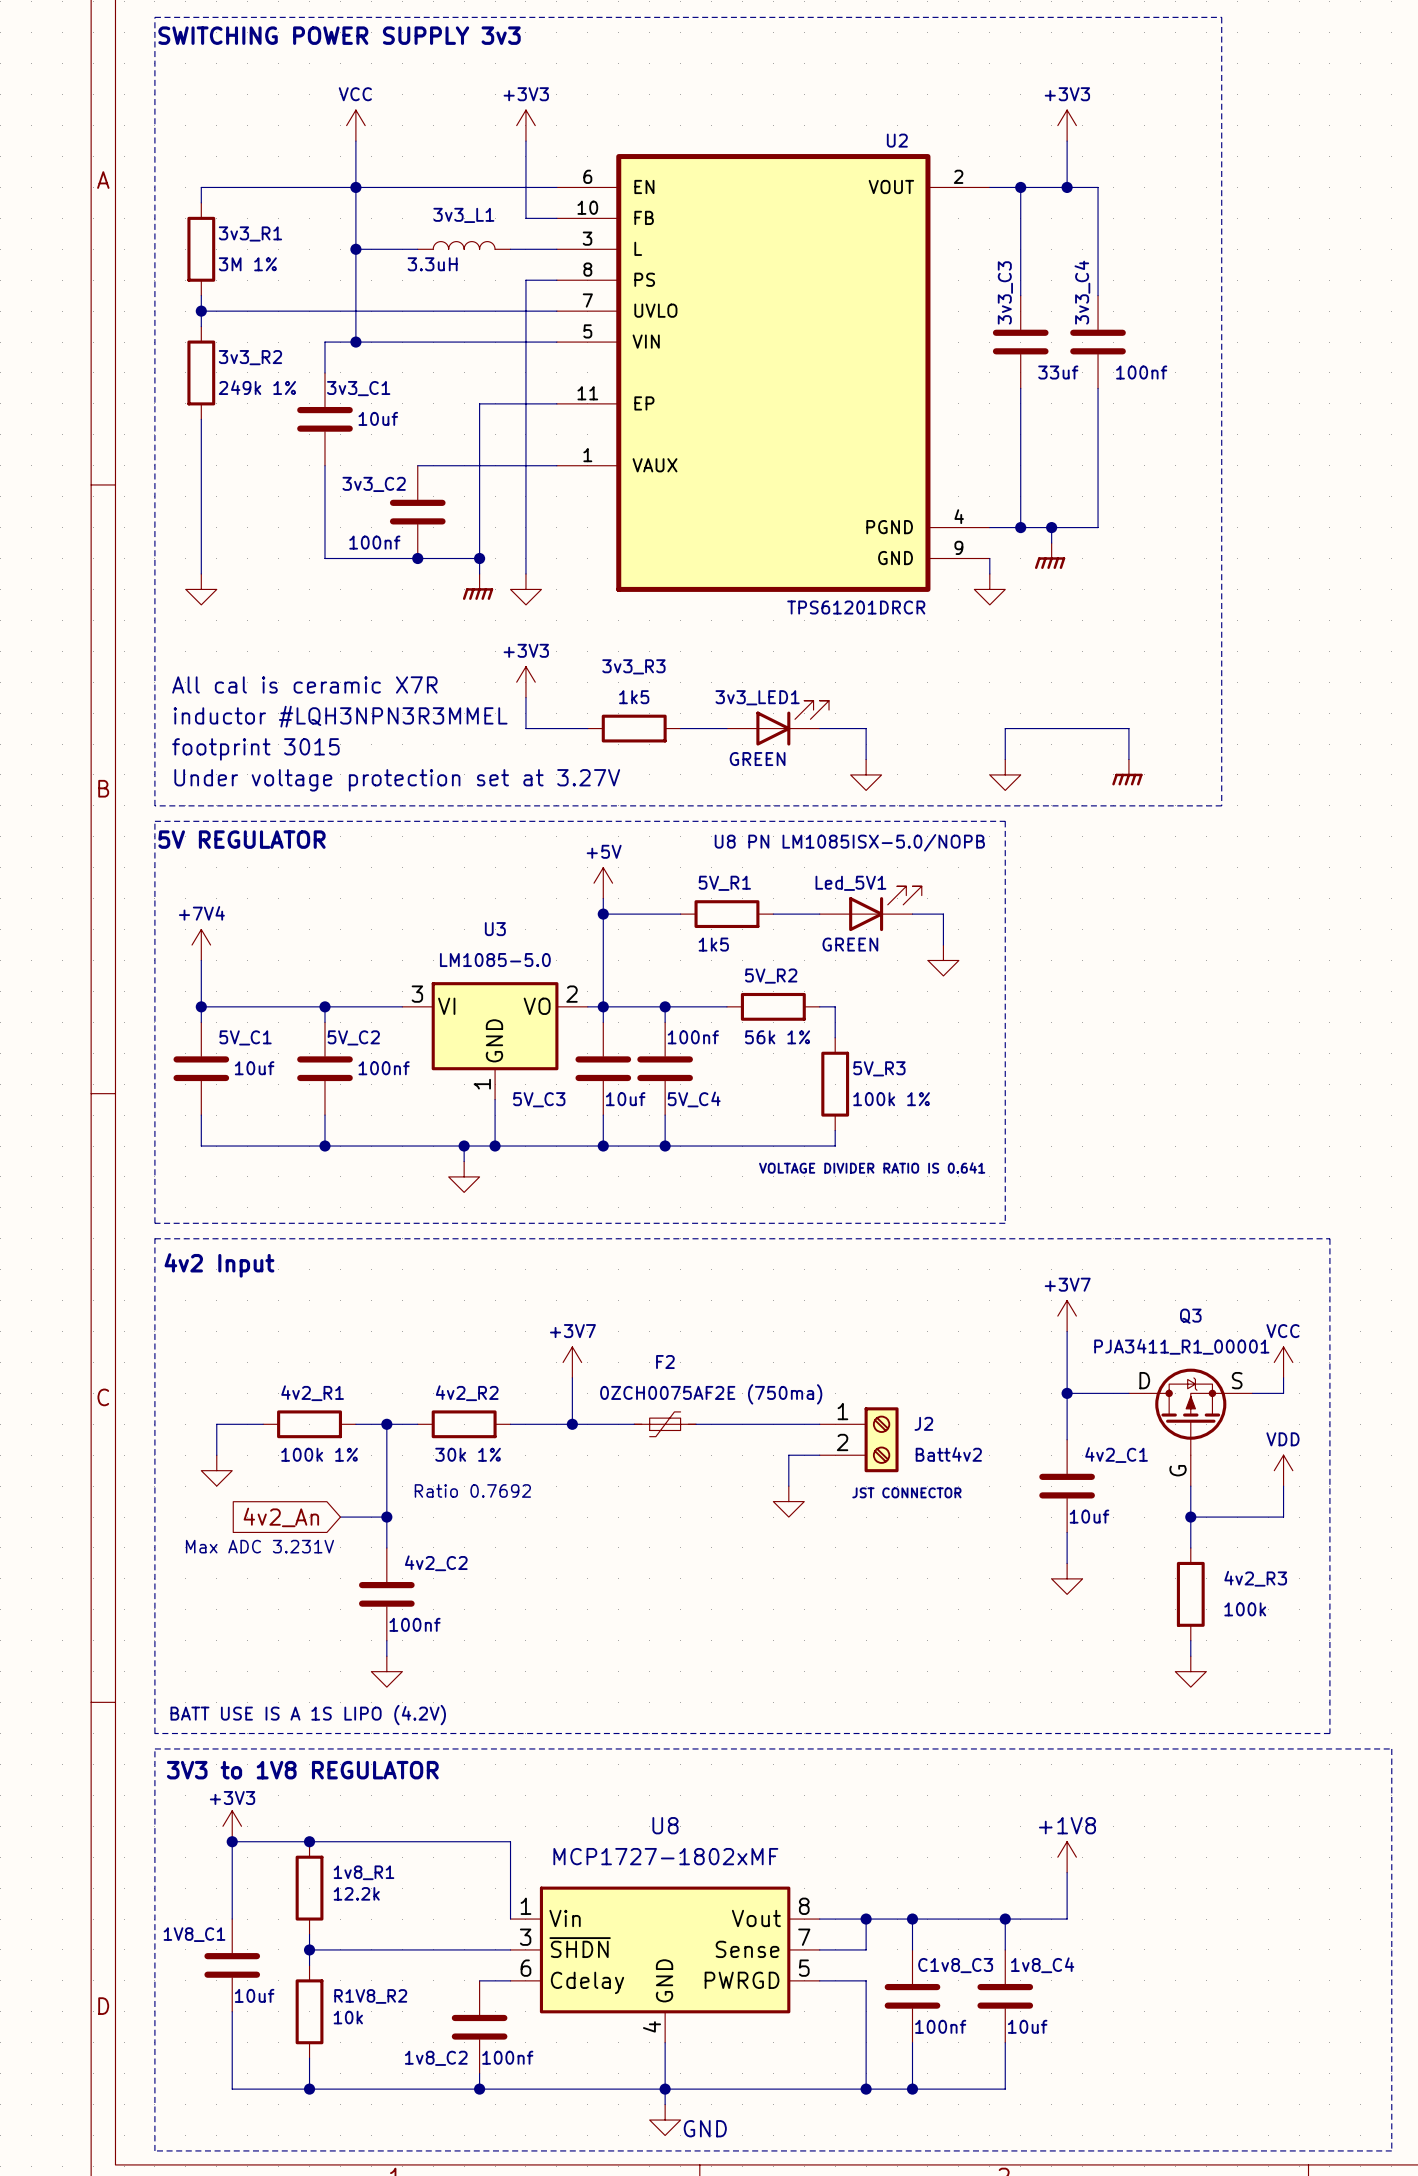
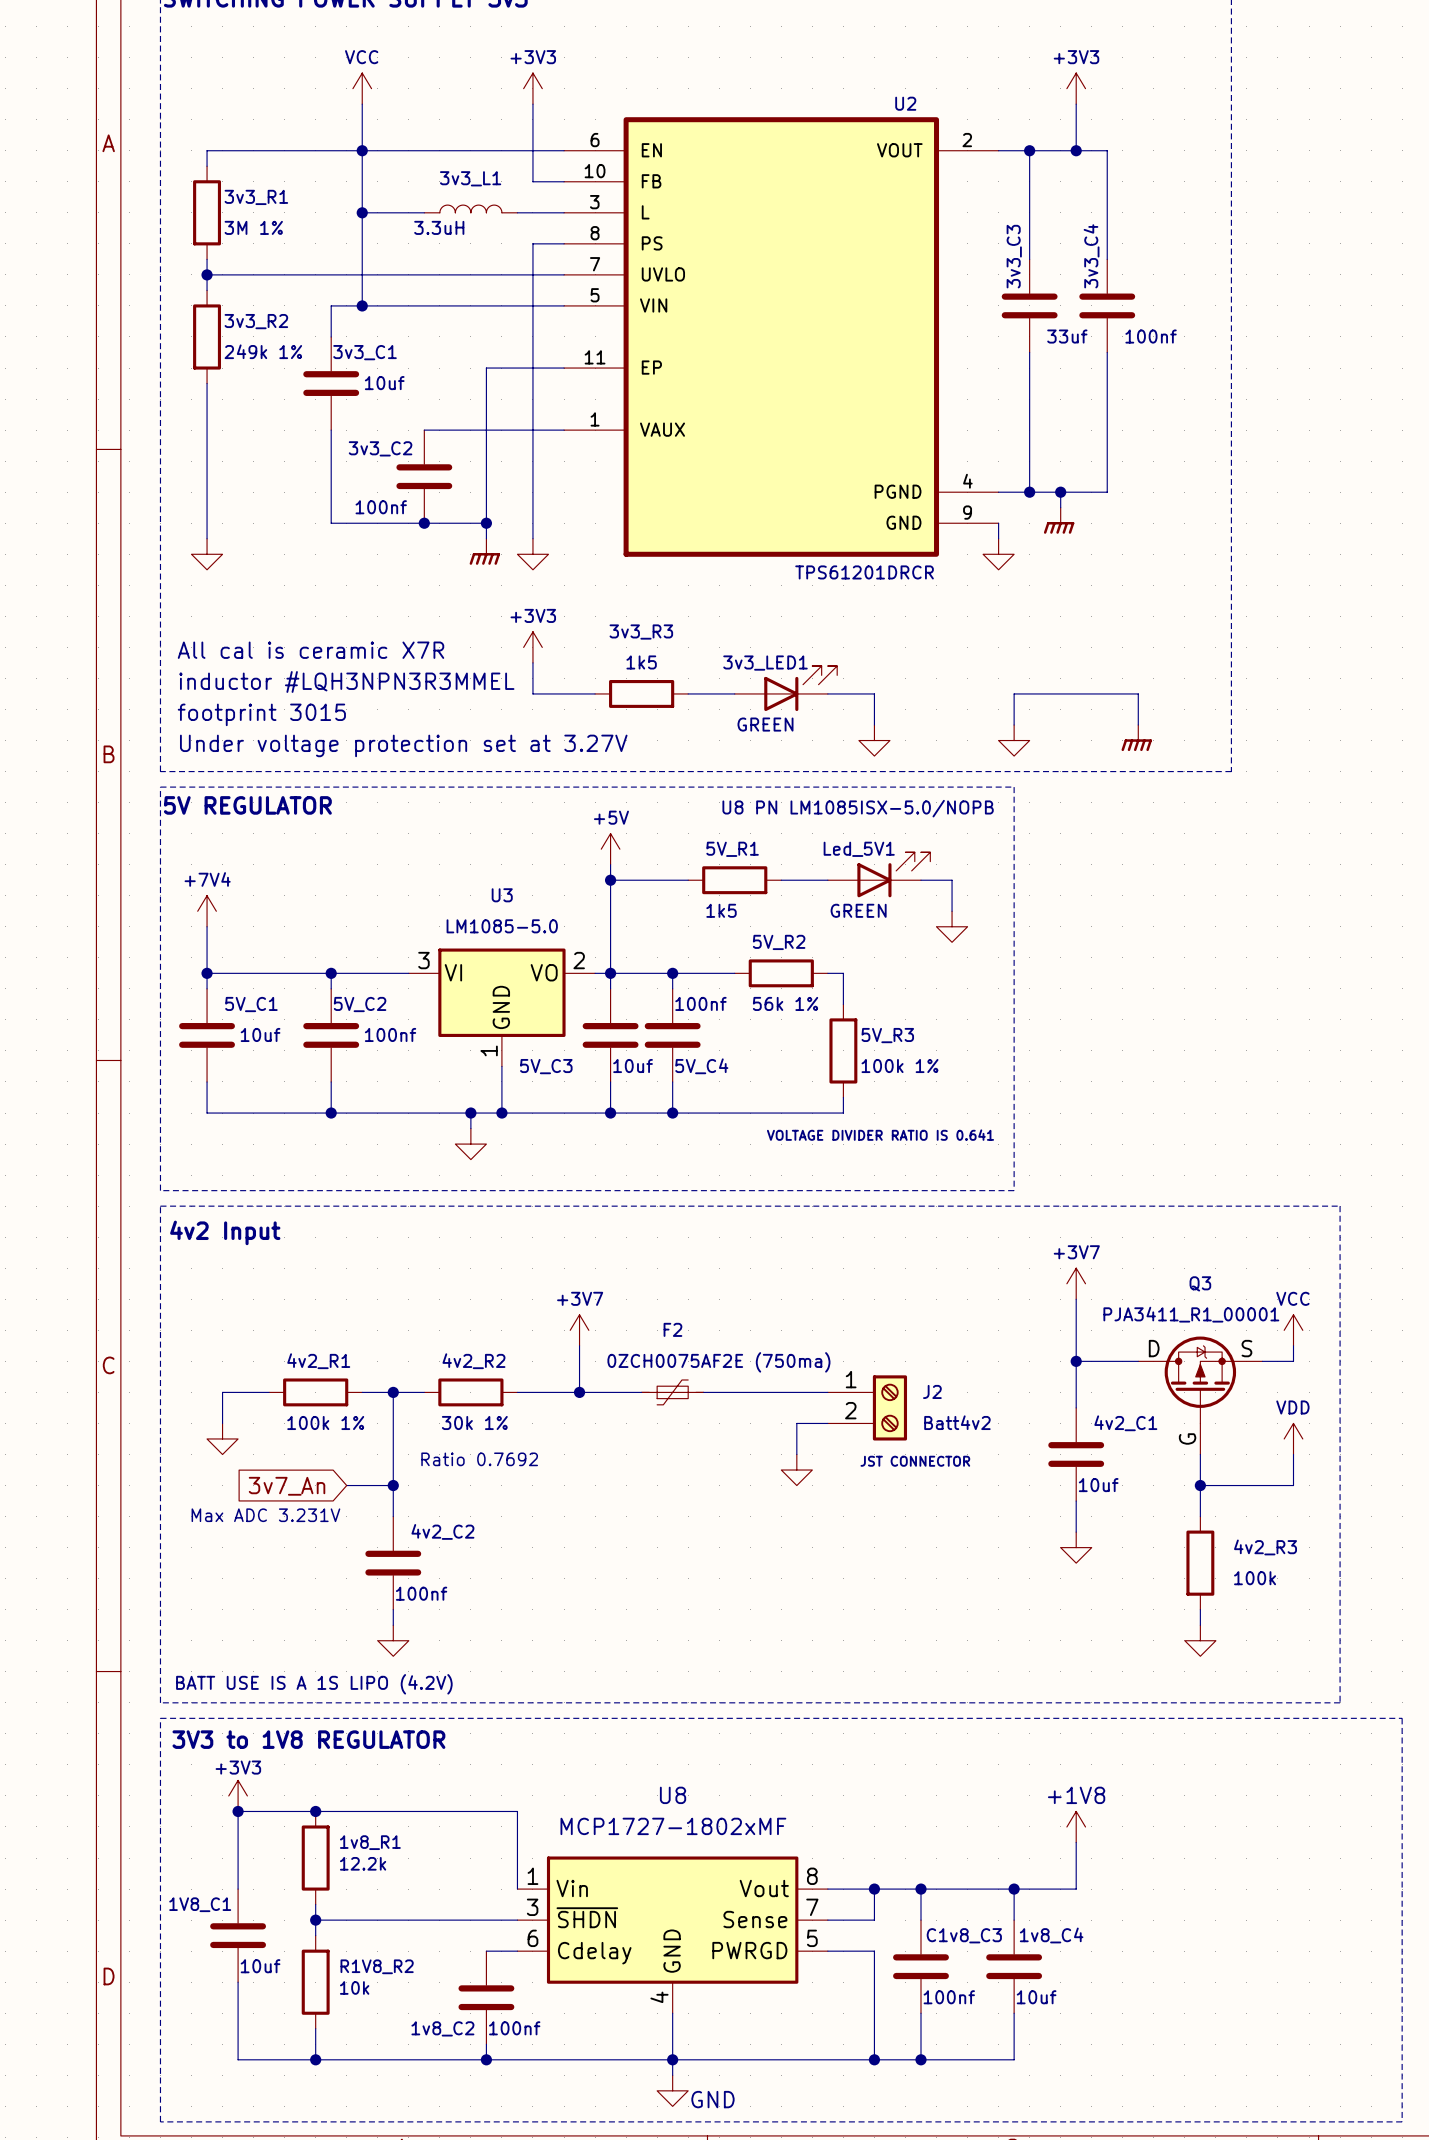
global label: 4v2_An (281, 1517) -> 3v7_An (287, 1486)

